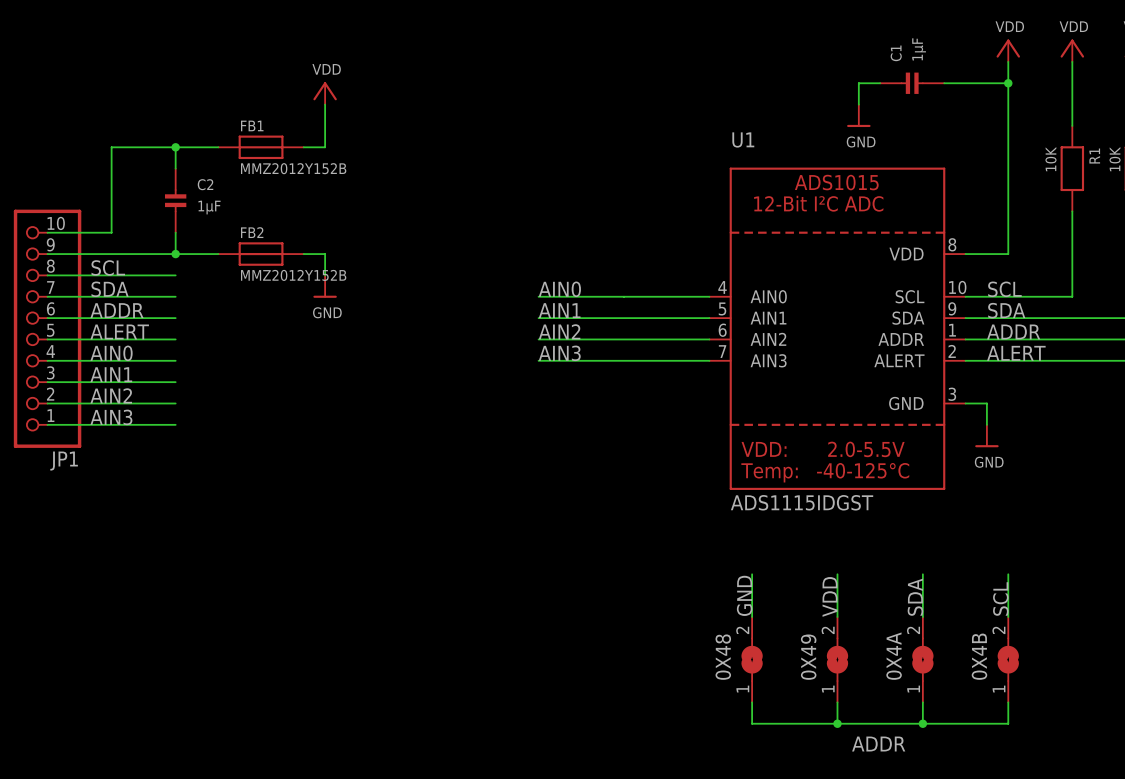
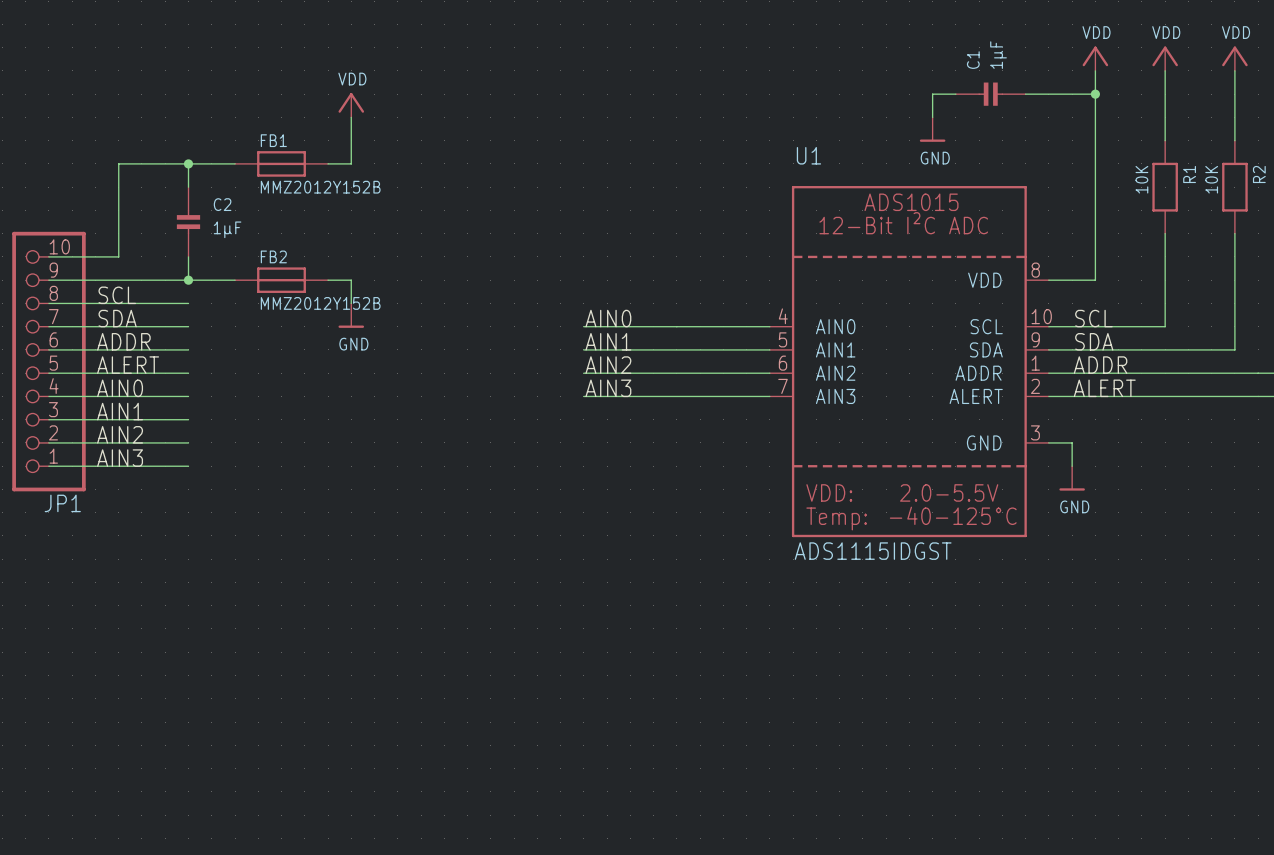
wire: (752, 574) (752, 616) -> none
wire: (837, 574) (837, 616) -> none
wire: (922, 574) (922, 616) -> none
wire: (1008, 574) (1008, 616) -> none
label: GND (744, 595) -> none
label: VDD (830, 596) -> none
label: SDA (915, 597) -> none
label: SCL (1000, 599) -> none
0X48: (752, 659) -> none
0X49: (837, 659) -> none
0X4A: (922, 659) -> none
0X4B: (1008, 659) -> none
wire: (752, 702) (752, 723) (1008, 723) (1008, 702) -> none
wire: (837, 702) (837, 723) -> none
wire: (922, 702) (922, 723) -> none
junction: (837, 723) -> none
junction: (922, 723) -> none
label: ADDR (878, 744) -> none

